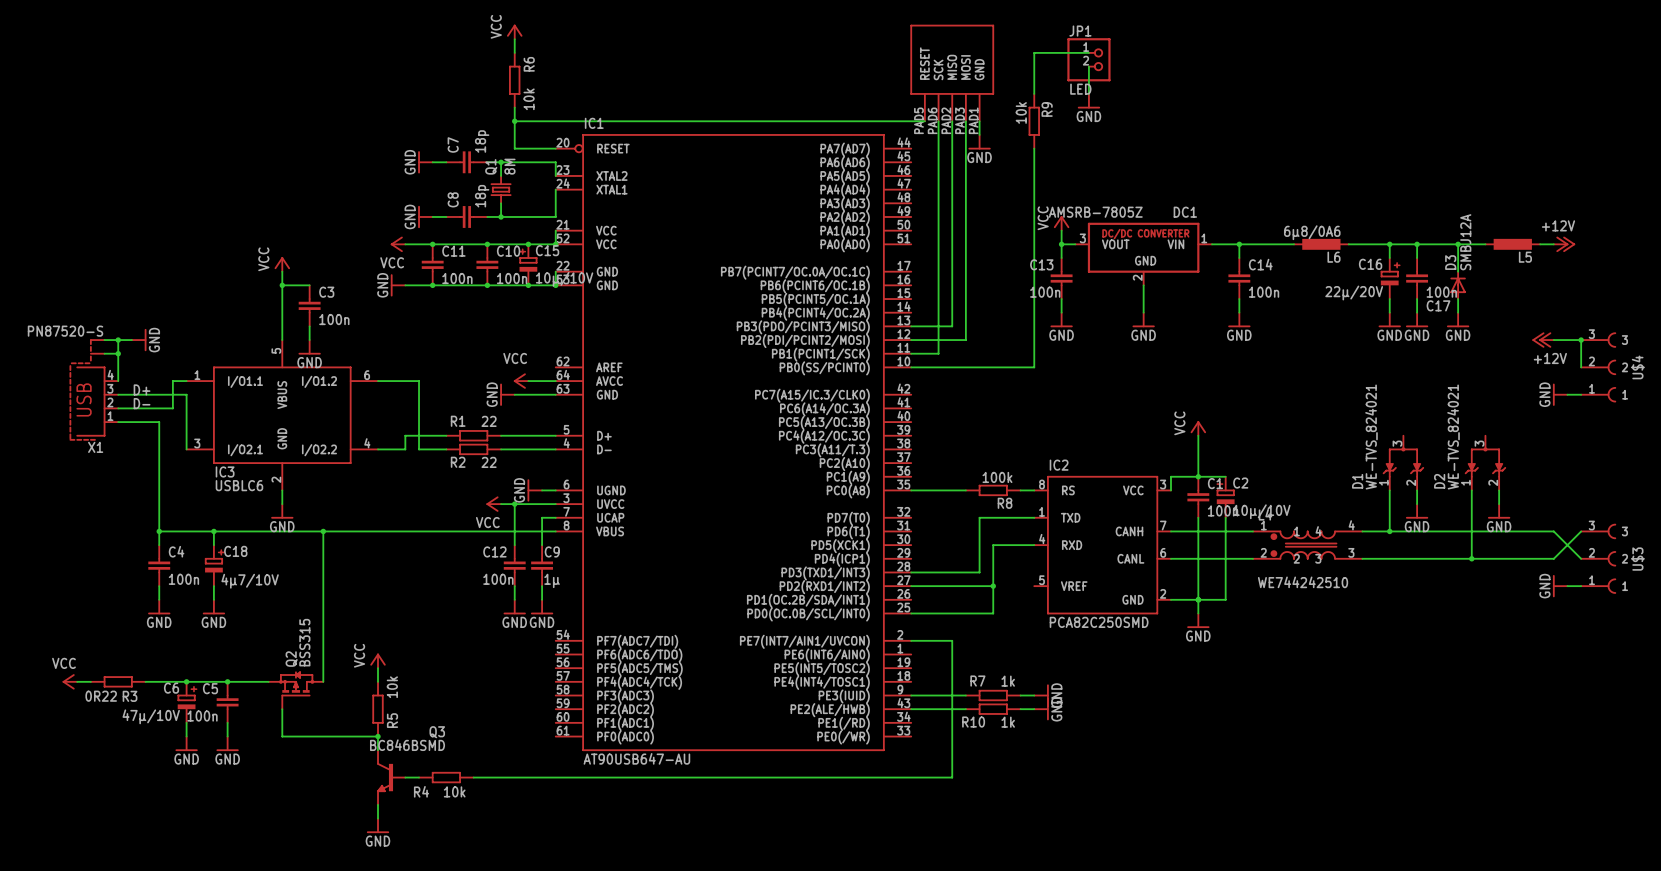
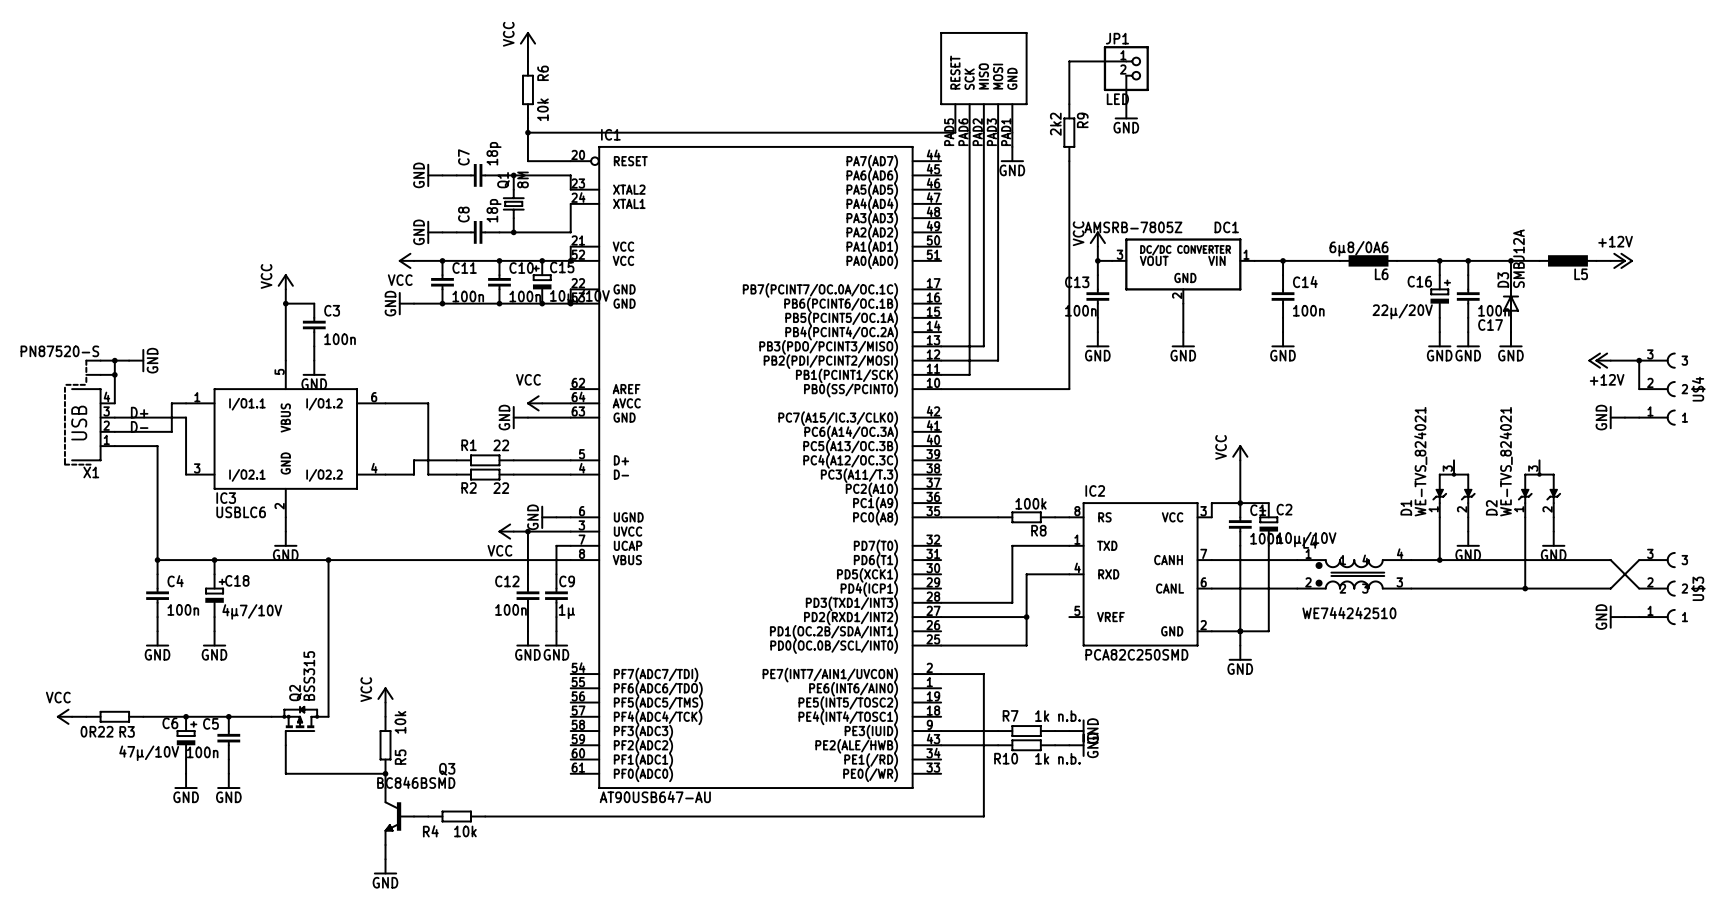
R9 value: 10k (1021, 112) -> 2k2 (1055, 124)
R7 value: 1k (1008, 681) -> 1k n.b. (1057, 716)
R10 value: 1k (1008, 722) -> 1k n.b. (1057, 758)

